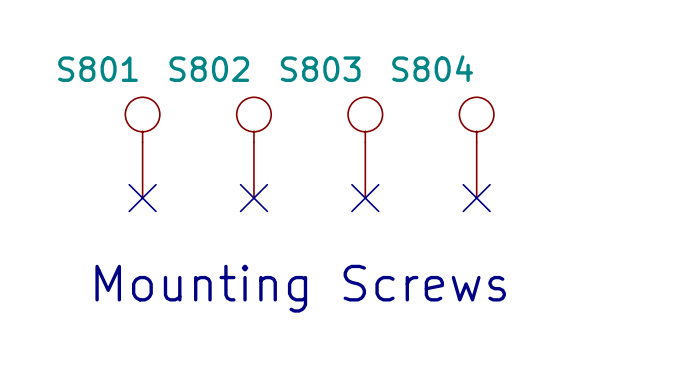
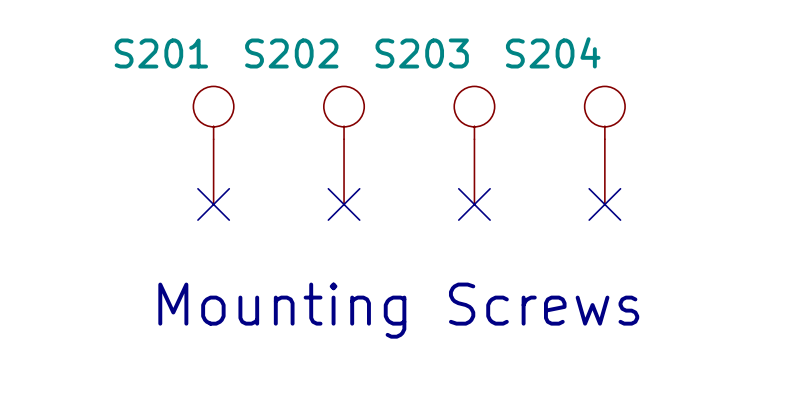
S804 name: S804 (432, 68) -> S204 (553, 52)
S801 name: S801 (97, 69) -> S201 (161, 53)
S802 name: S802 (209, 69) -> S202 (291, 53)
S803 name: S803 (320, 69) -> S203 (422, 53)

